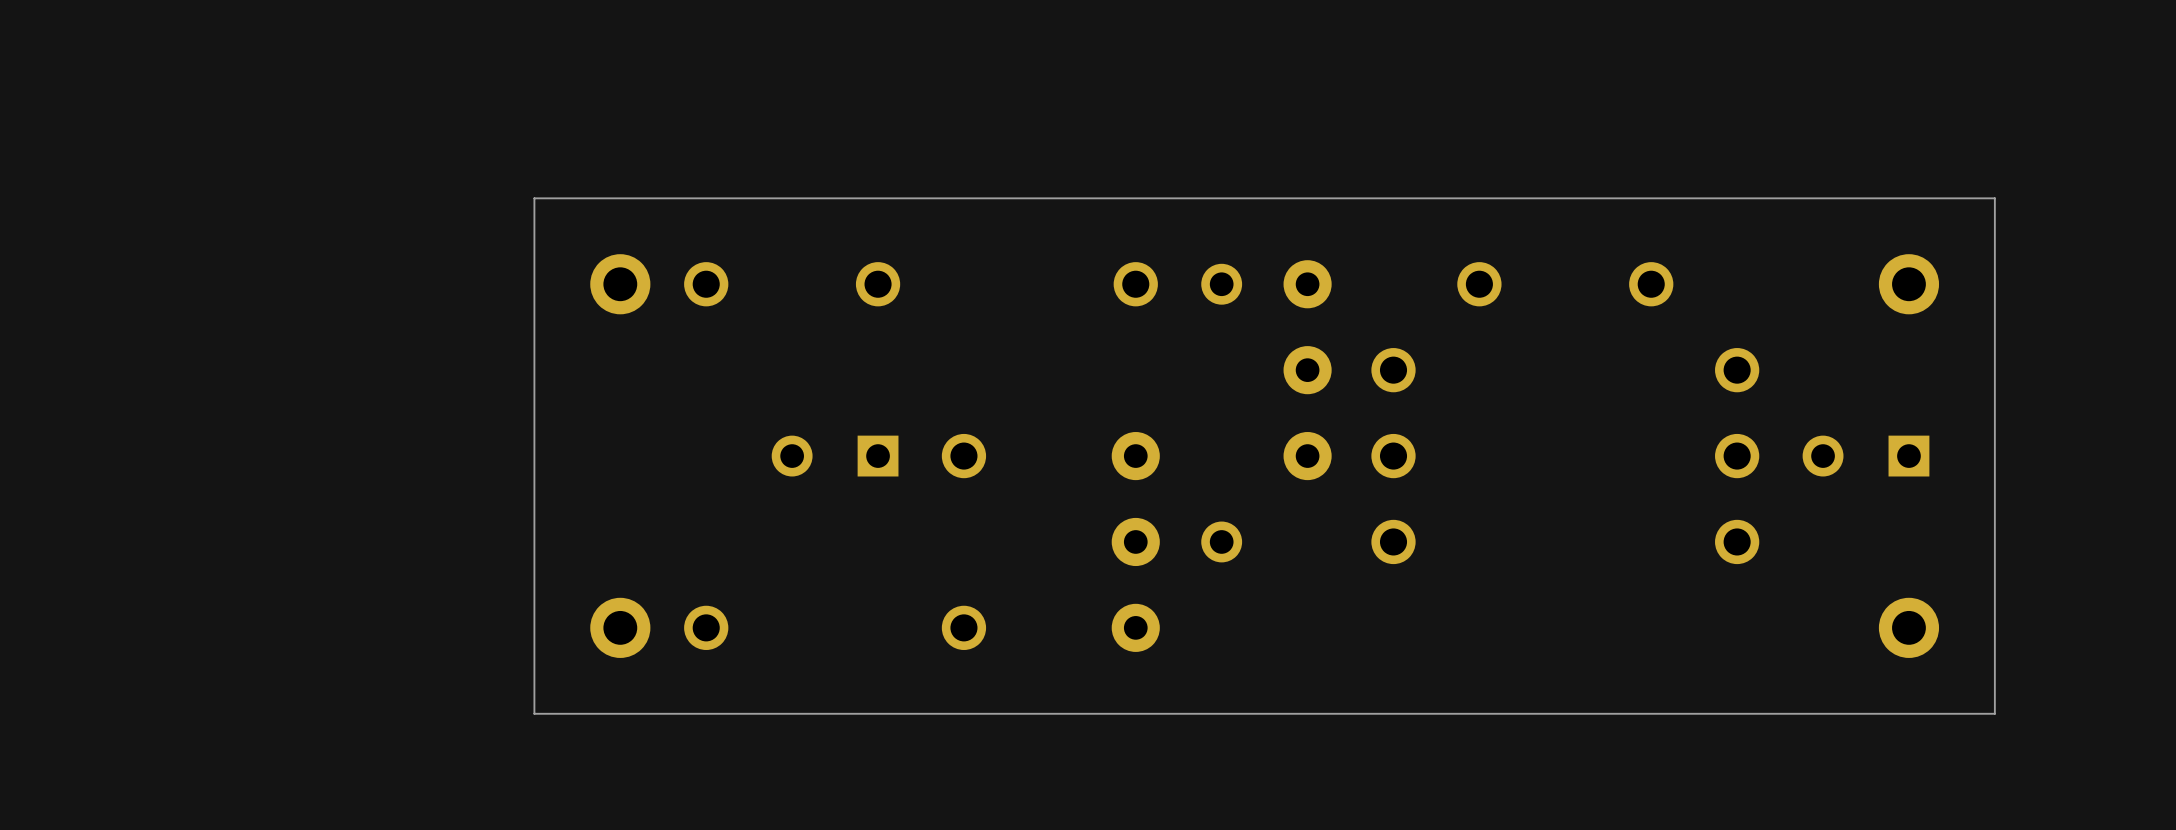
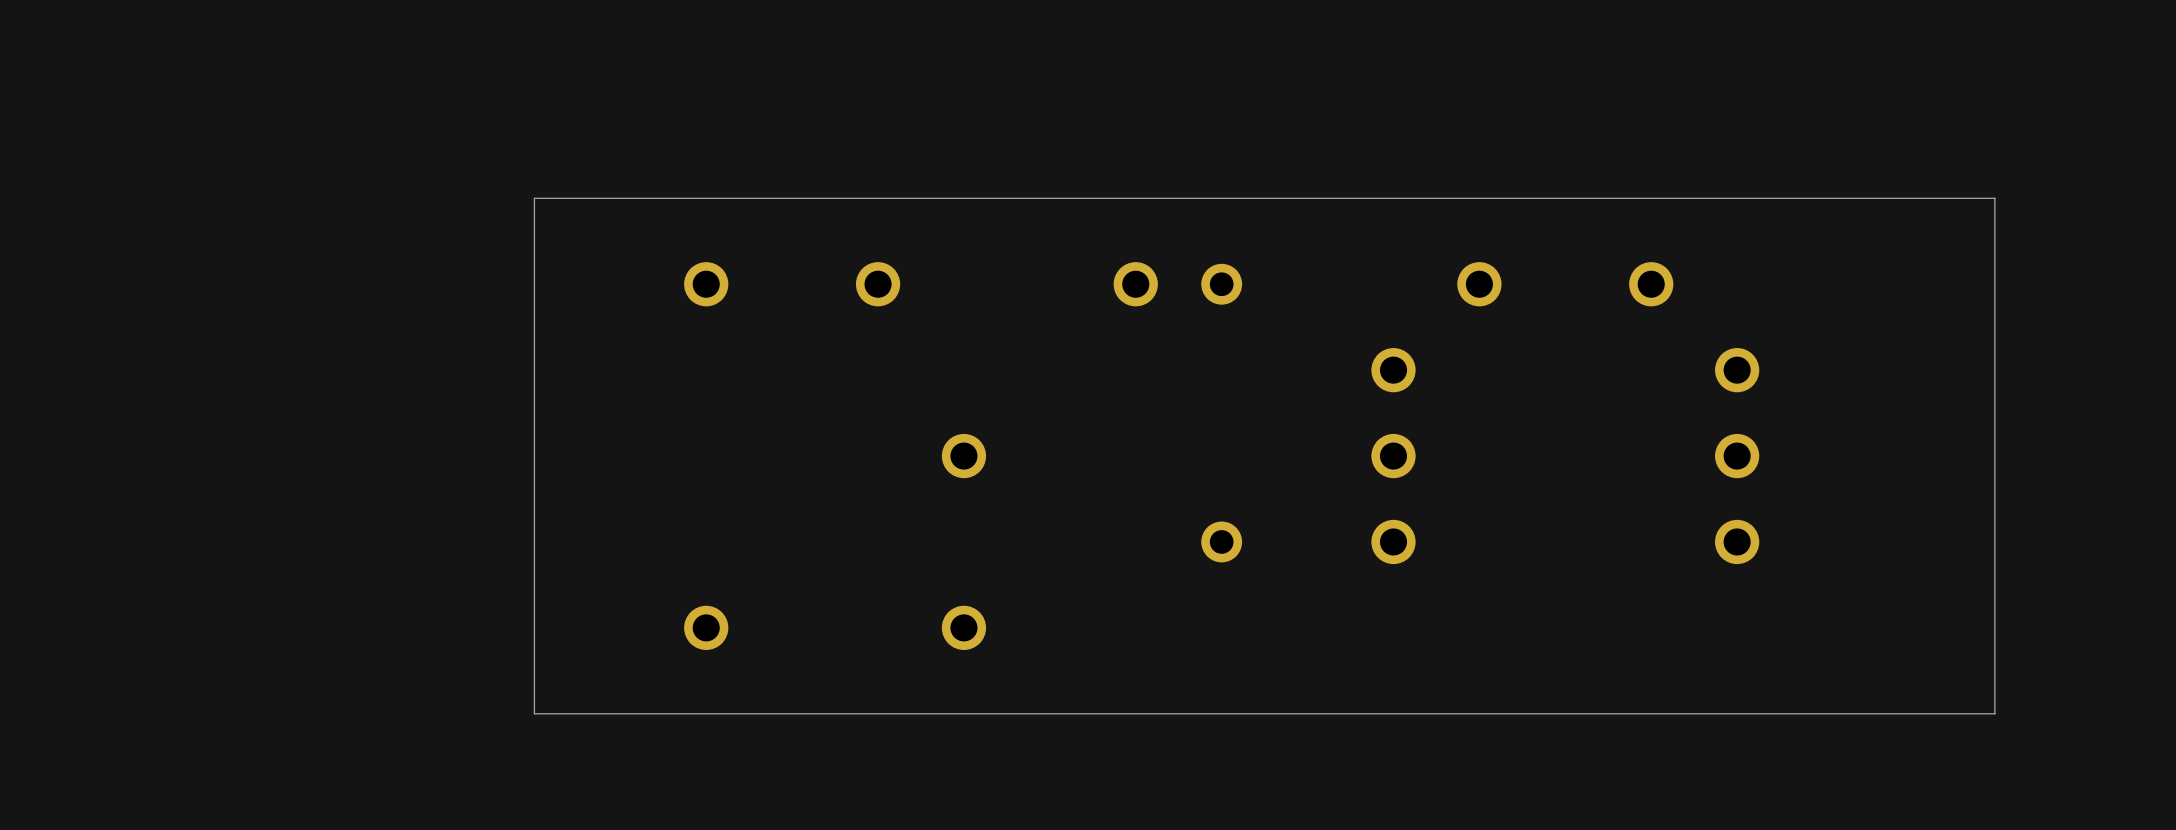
part: (620, 284) -> none
part: (1908, 284) -> none
part: (1307, 370) -> none
part: (835, 456) -> none
part: (1866, 456) -> none
part: (1135, 541) -> none
part: (620, 627) -> none
part: (1908, 627) -> none

